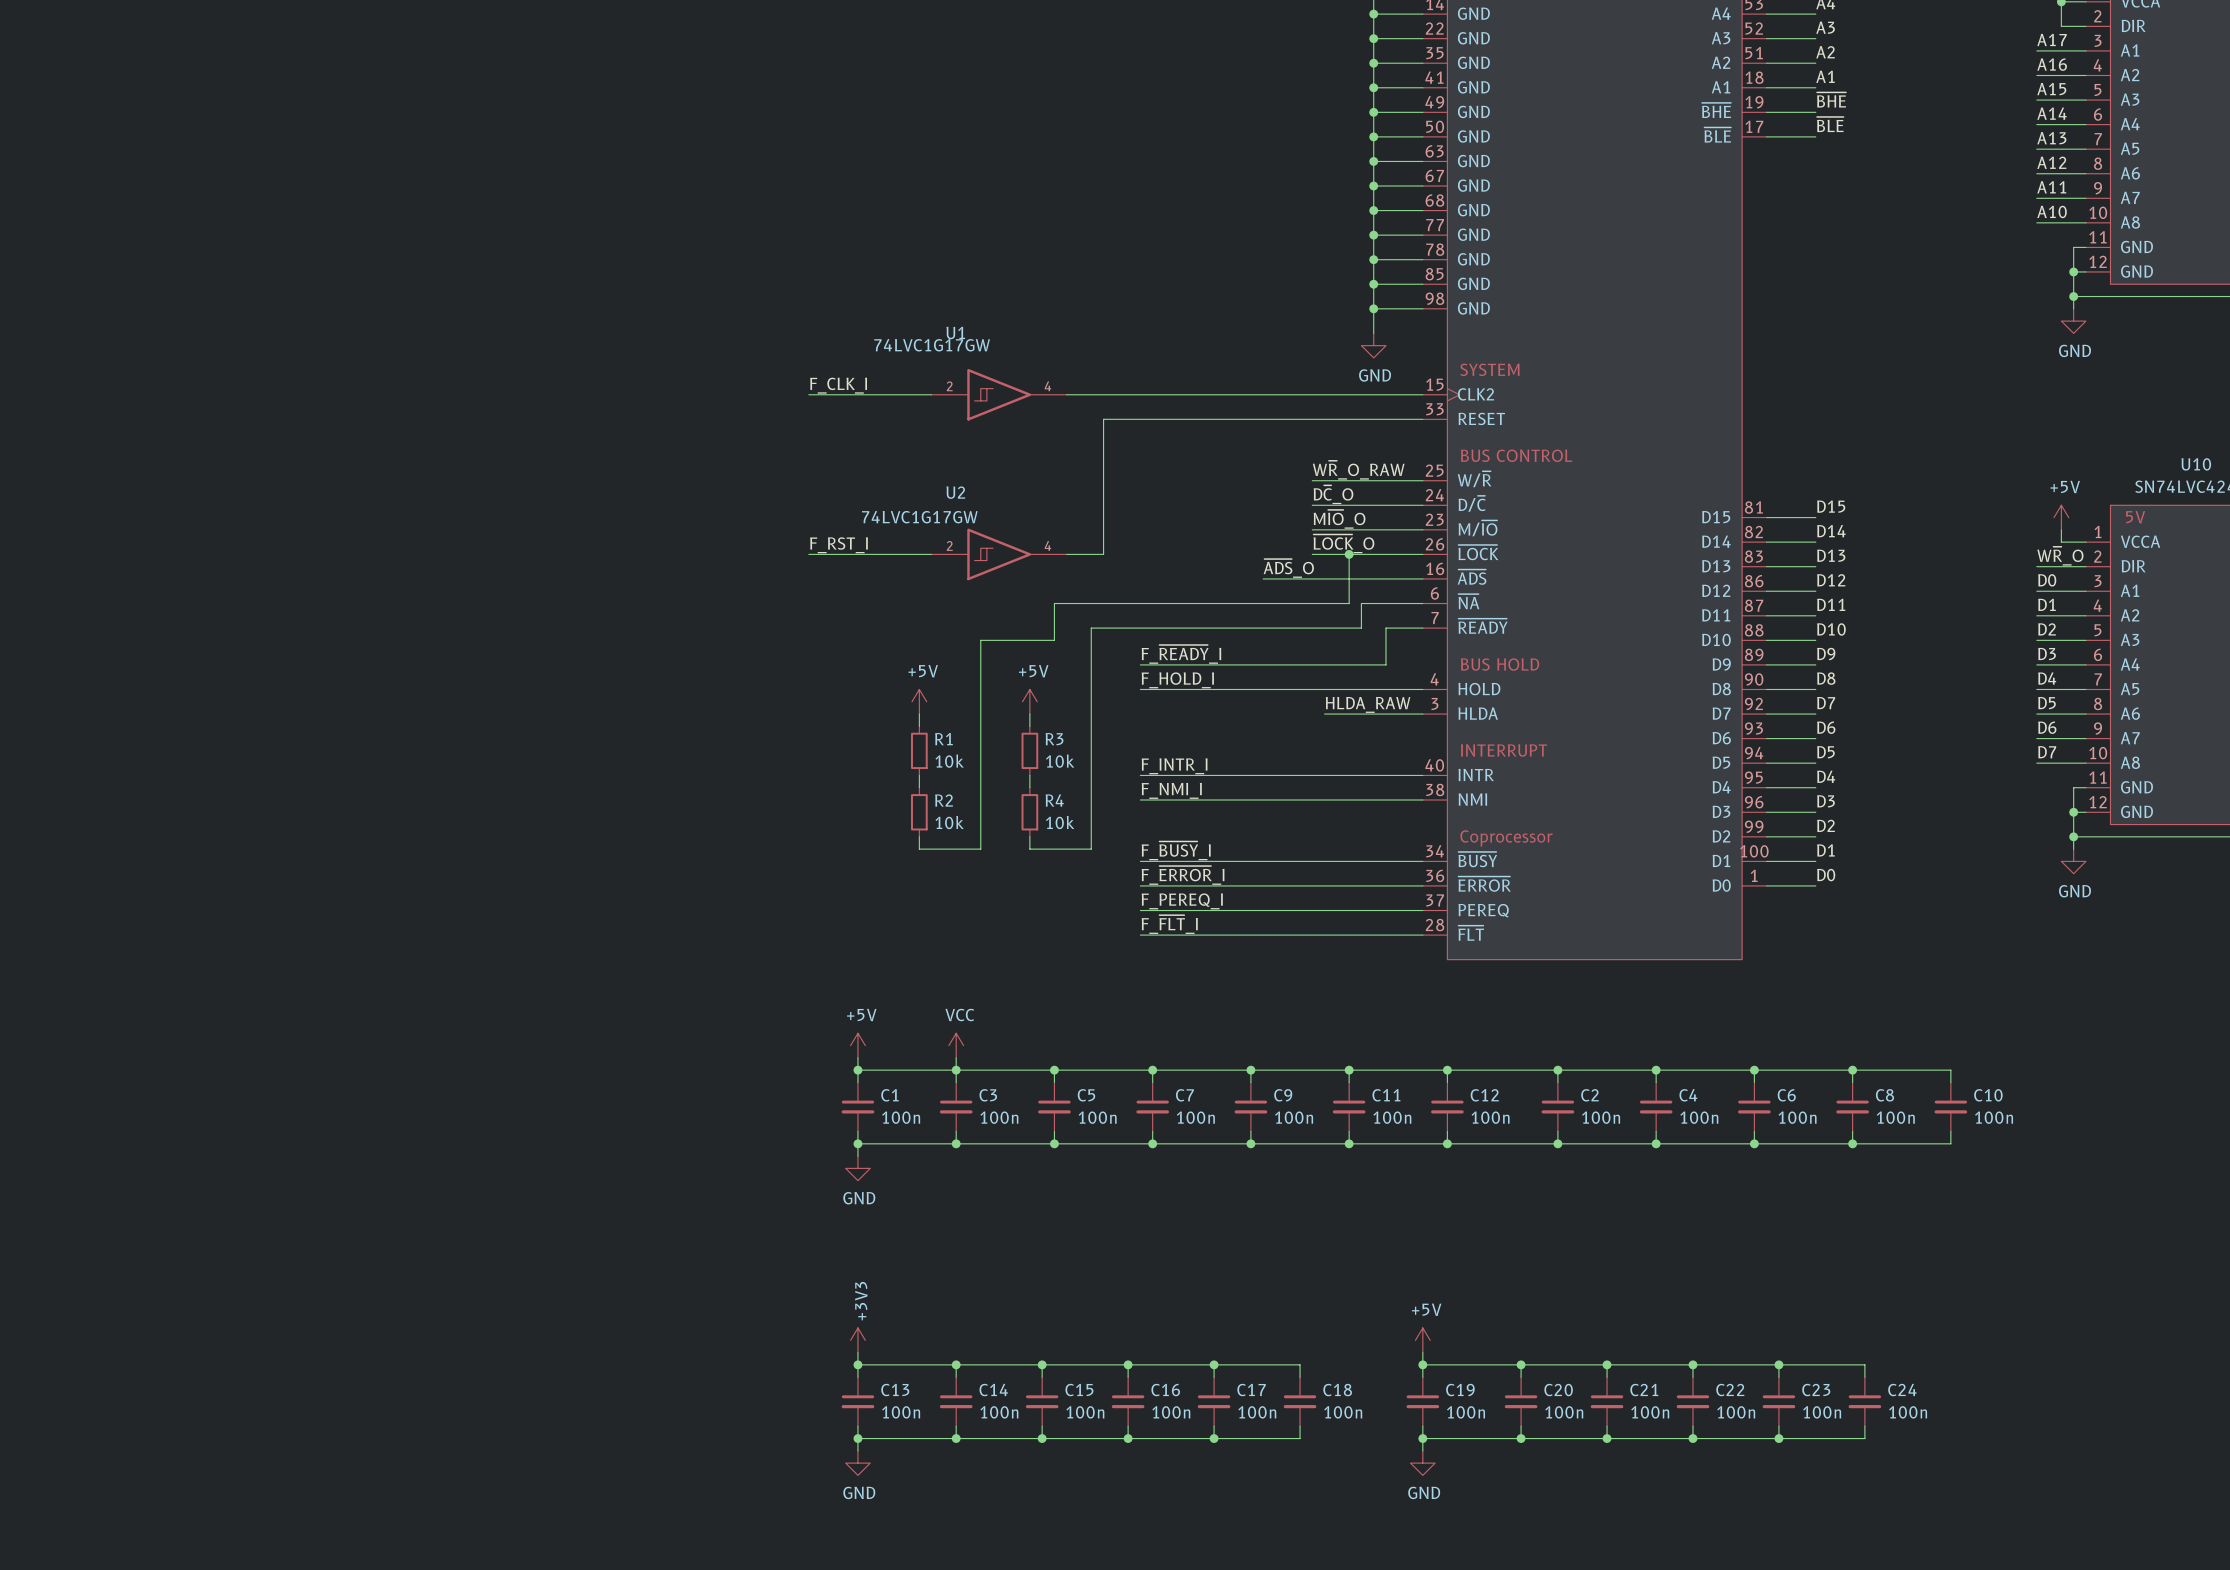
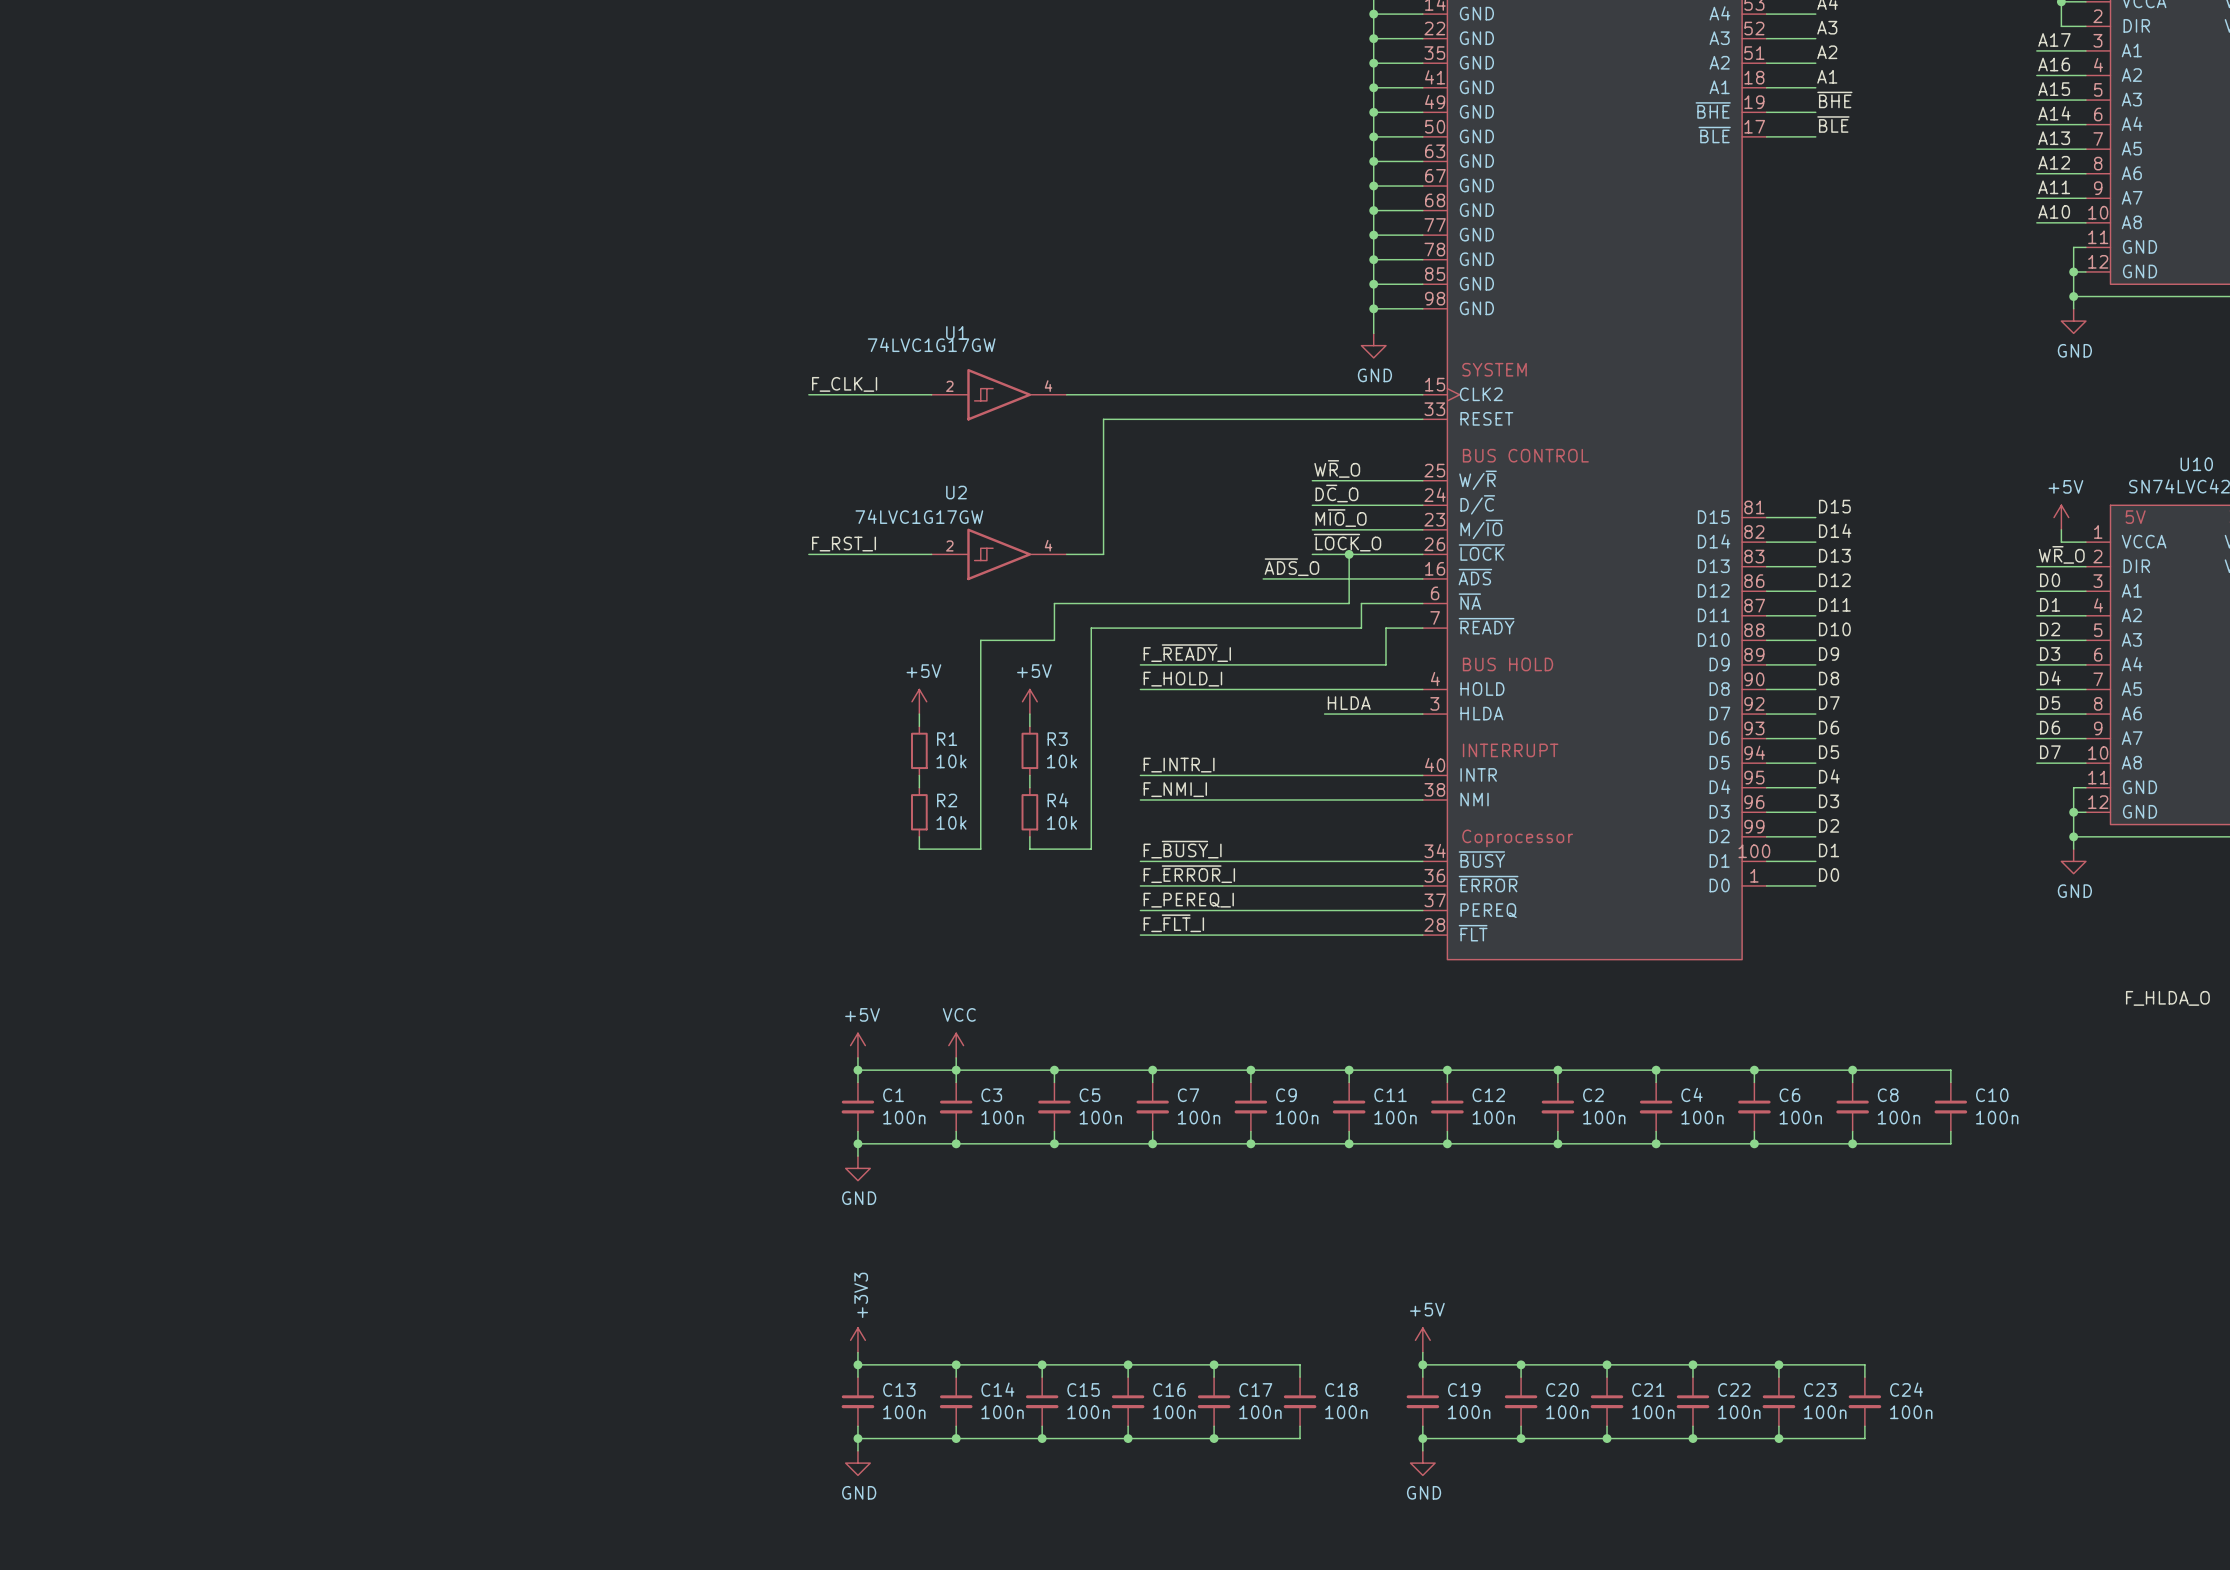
label: W~{R}_O_RAW (1358, 470) -> W~{R}_O (1337, 468)
label: HLDA_RAW (1368, 704) -> HLDA (1349, 703)
label: none -> F_HLDA_O (2167, 998)

